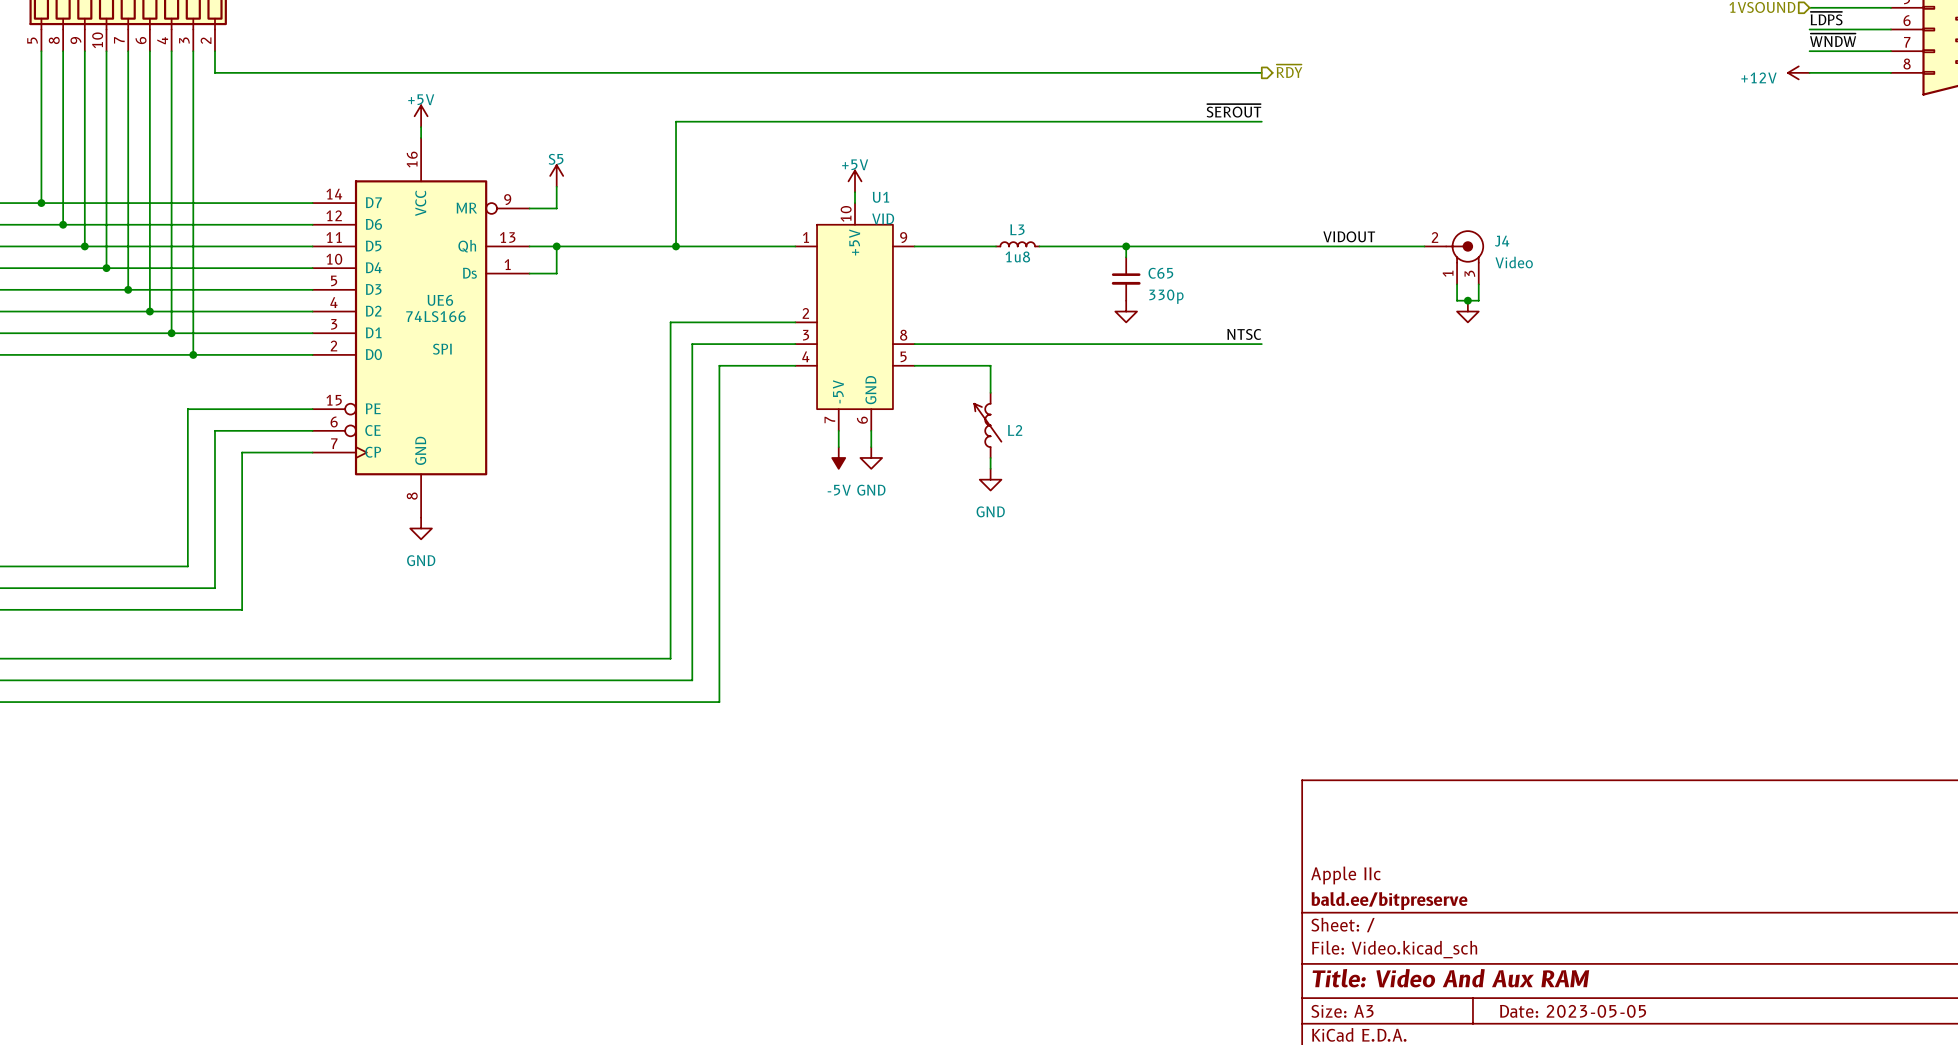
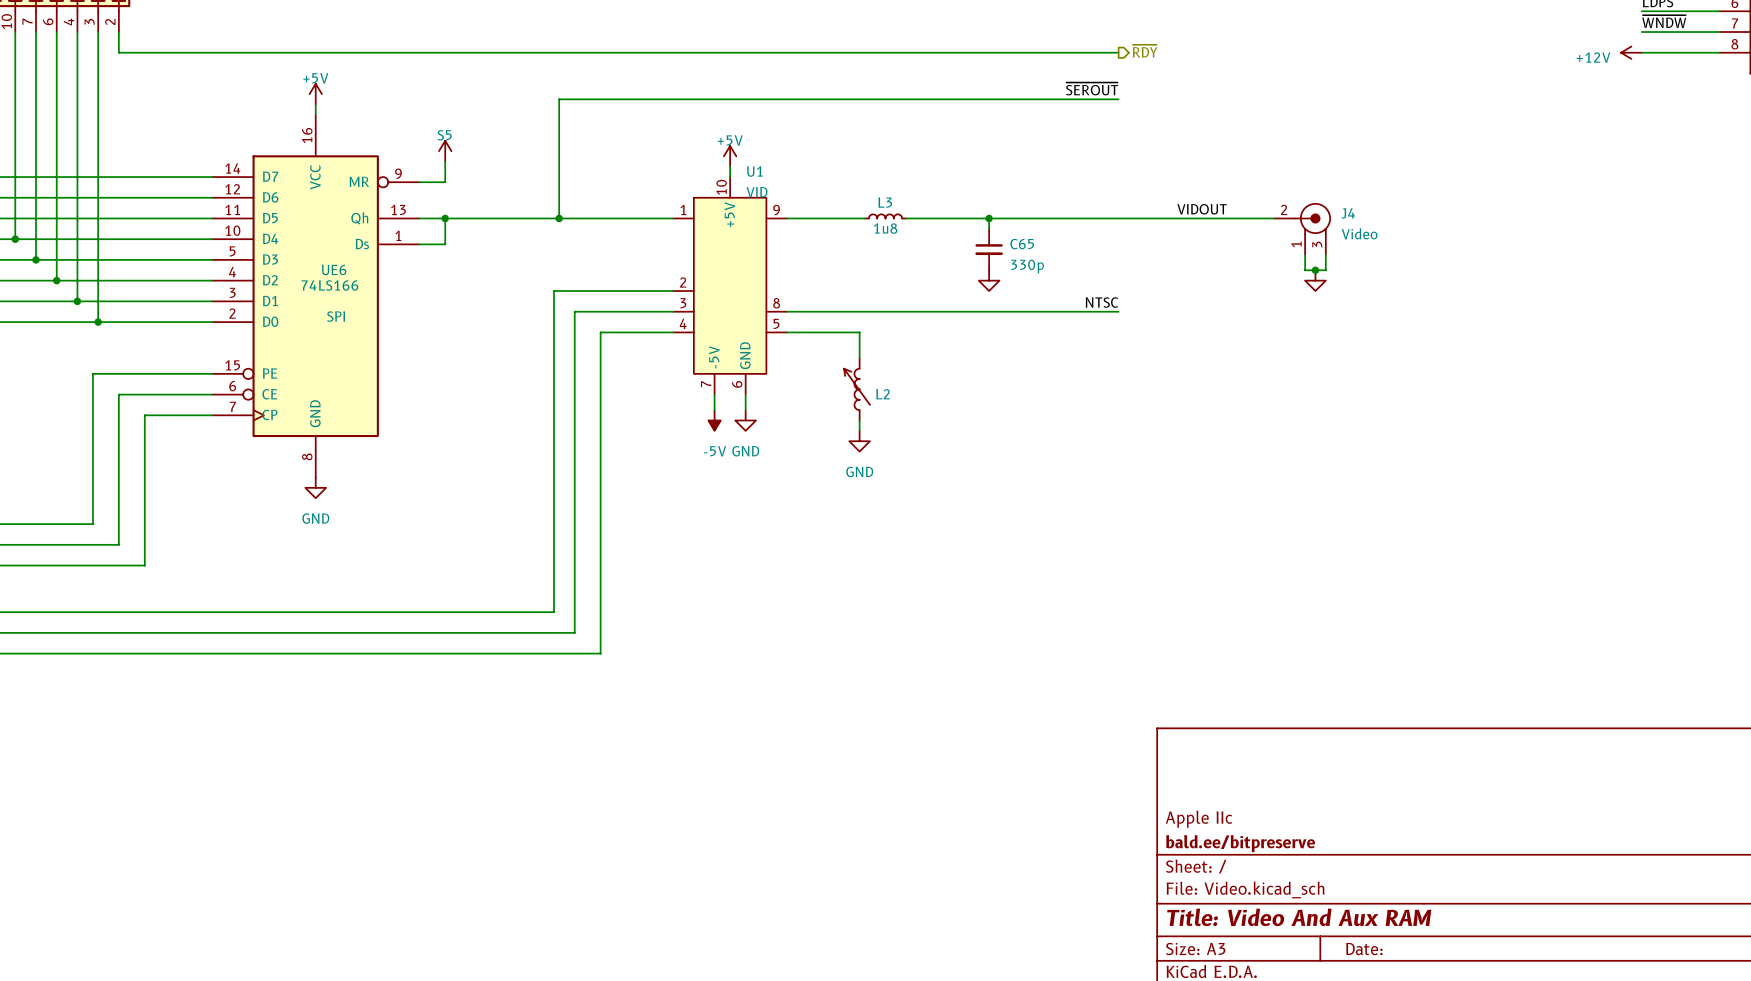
title block: Date: 2023-05-05 (1573, 1011) -> Date: (1364, 949)

